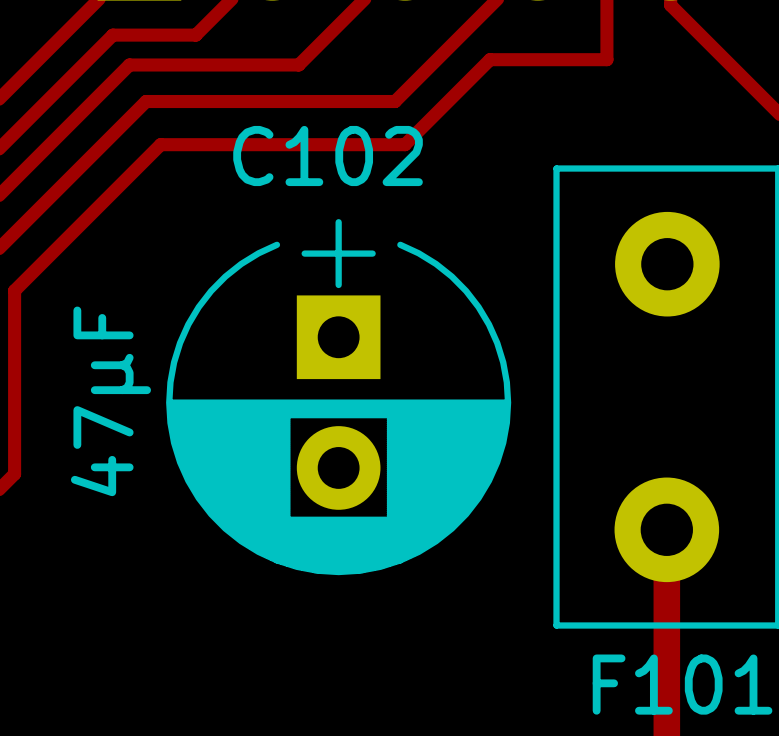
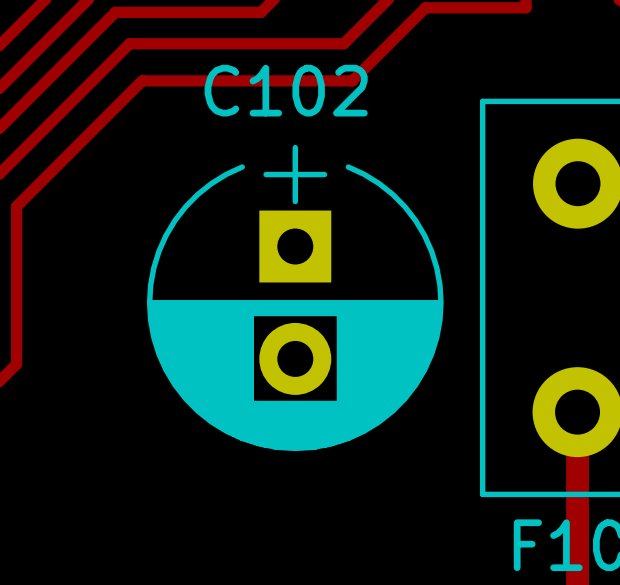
C102 value: 47µF (110, 401) -> none

